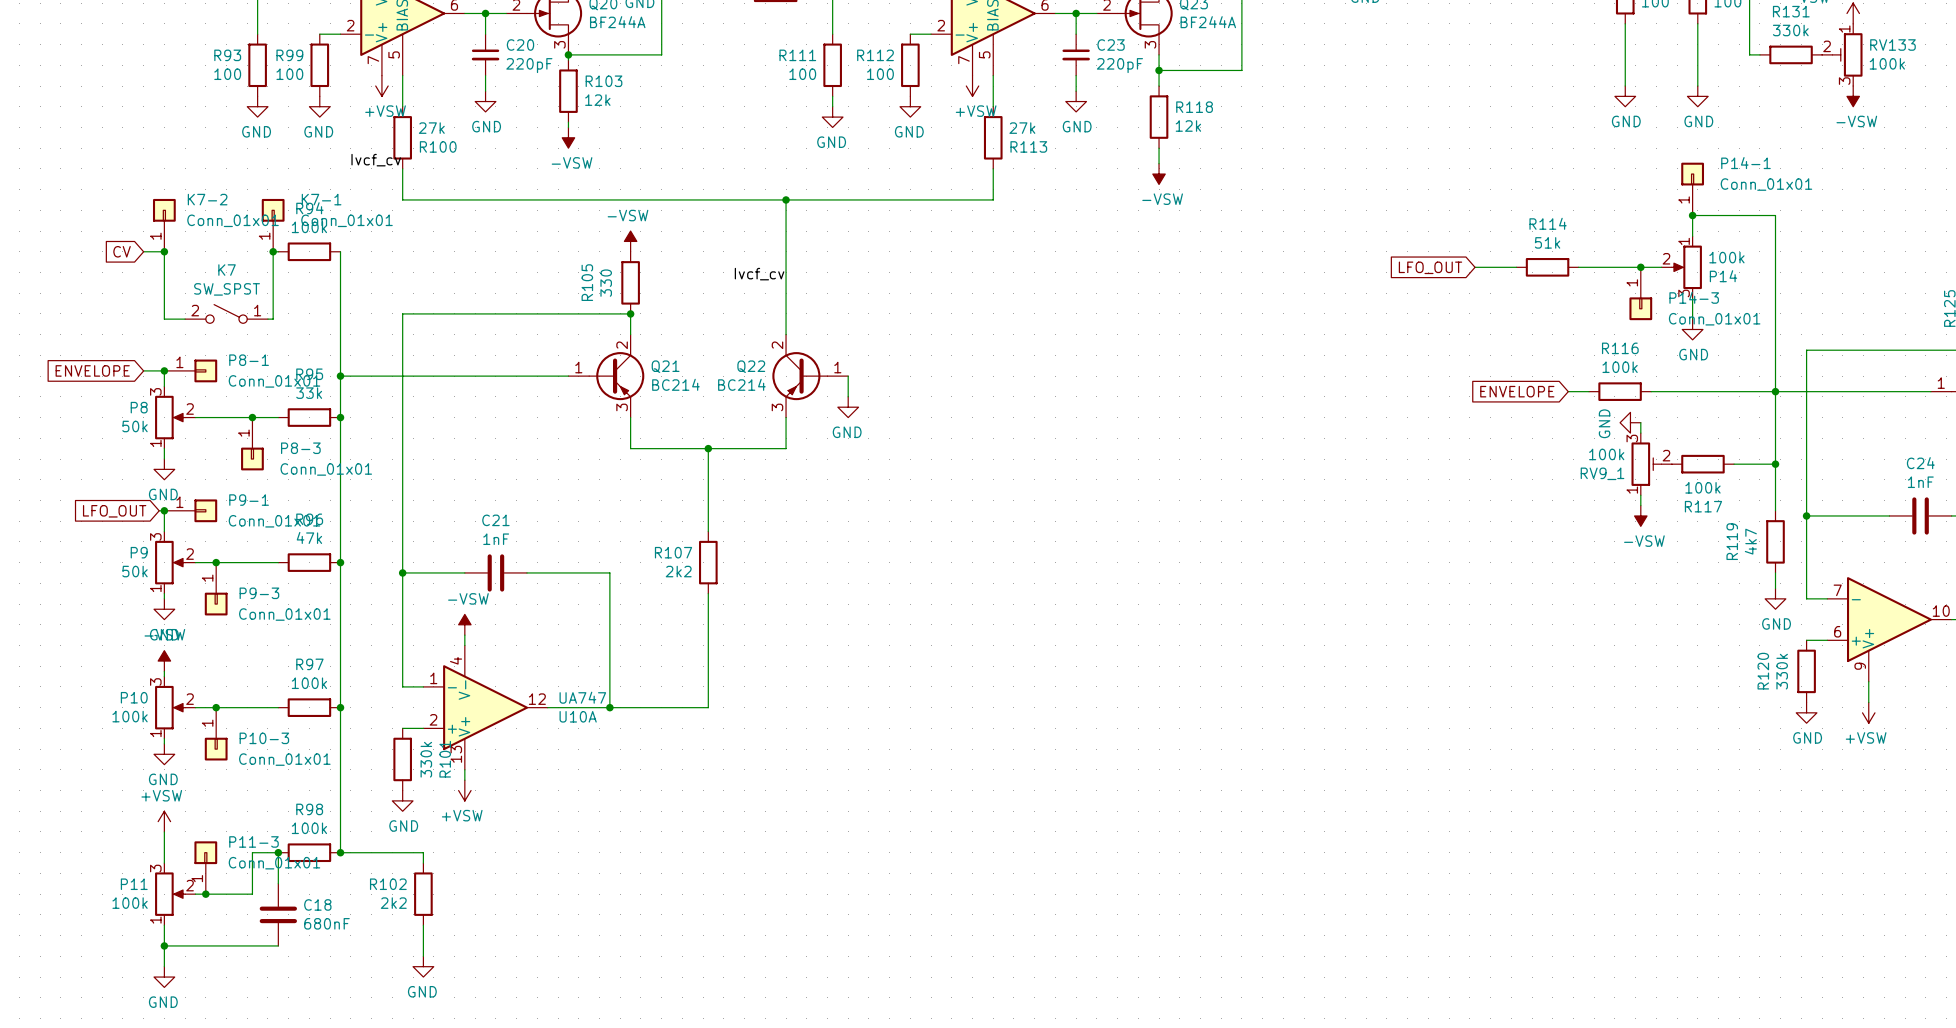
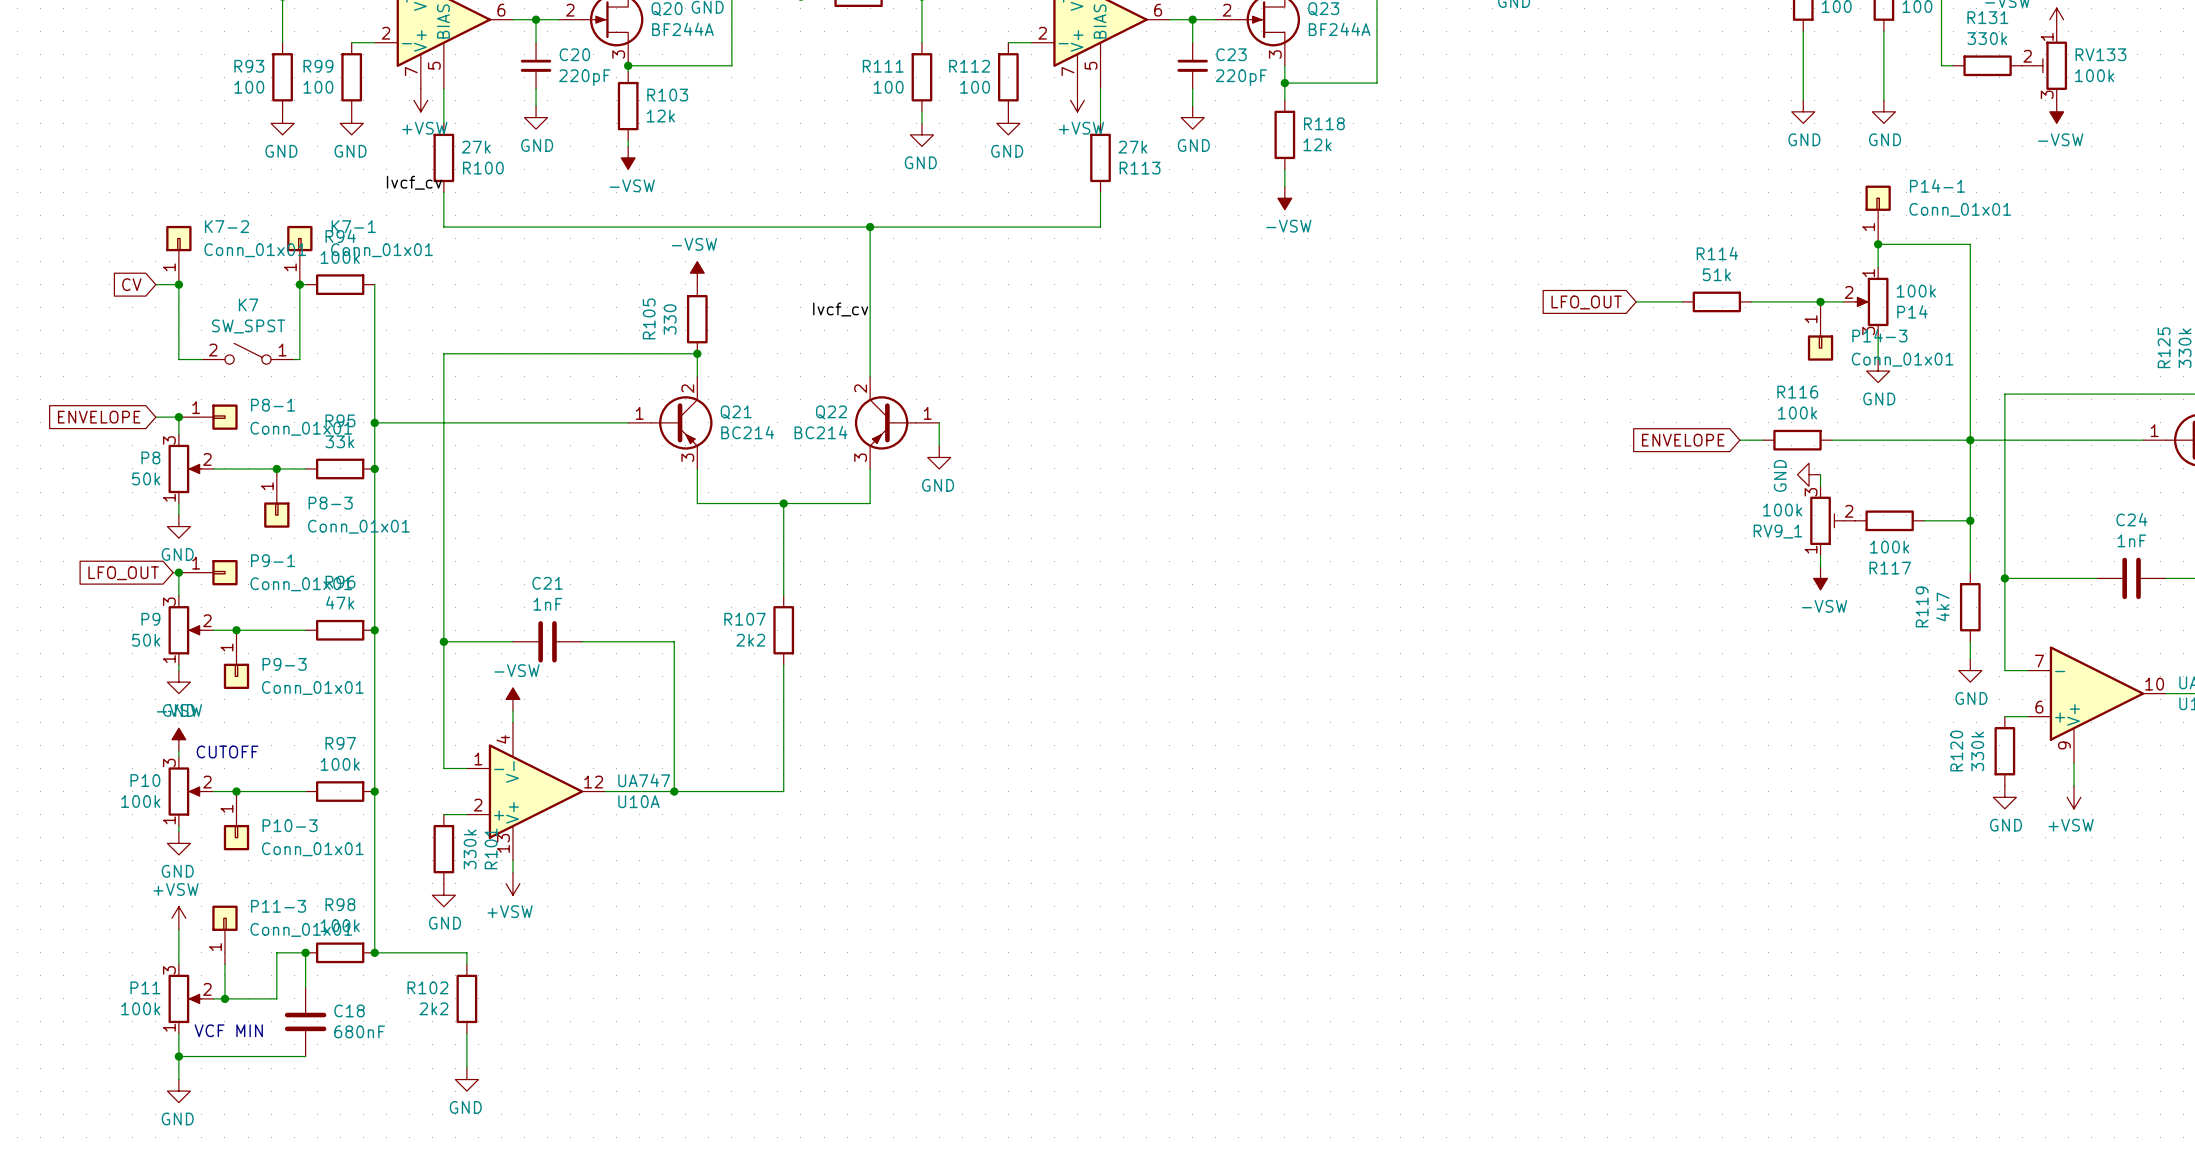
text: none -> CUTOFF (227, 751)
P11-3 position: (205, 867) -> (224, 934)
text: none -> VCF MIN (228, 1030)

